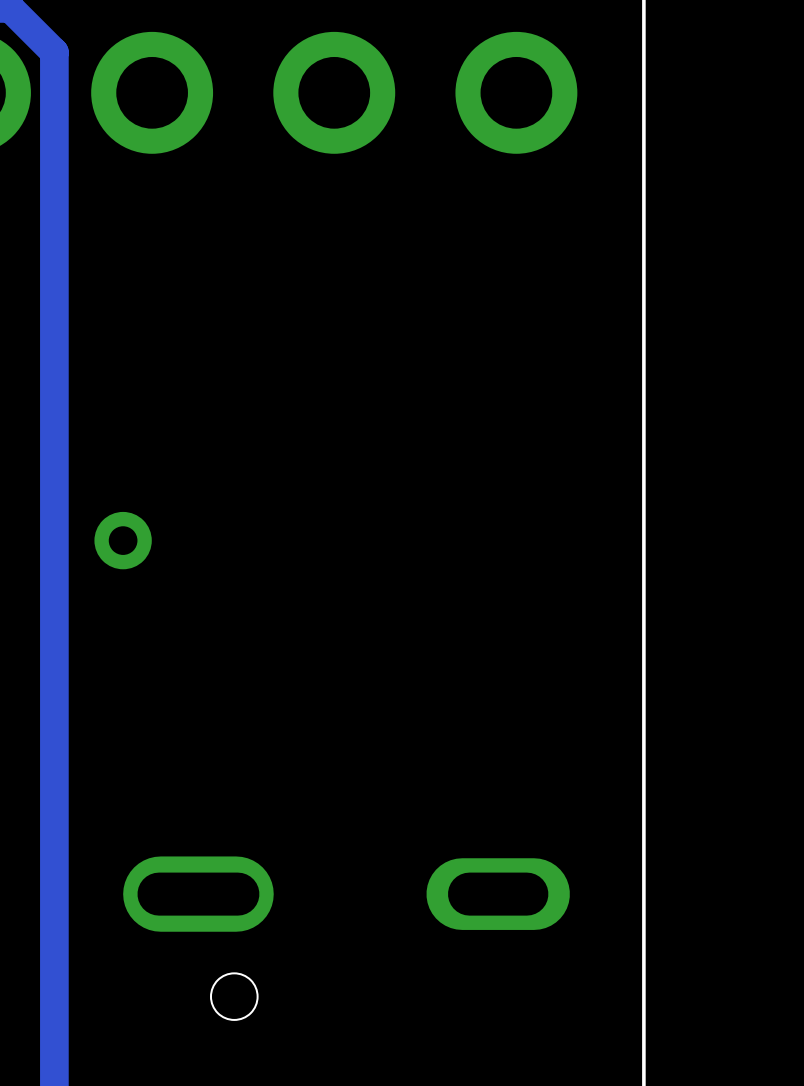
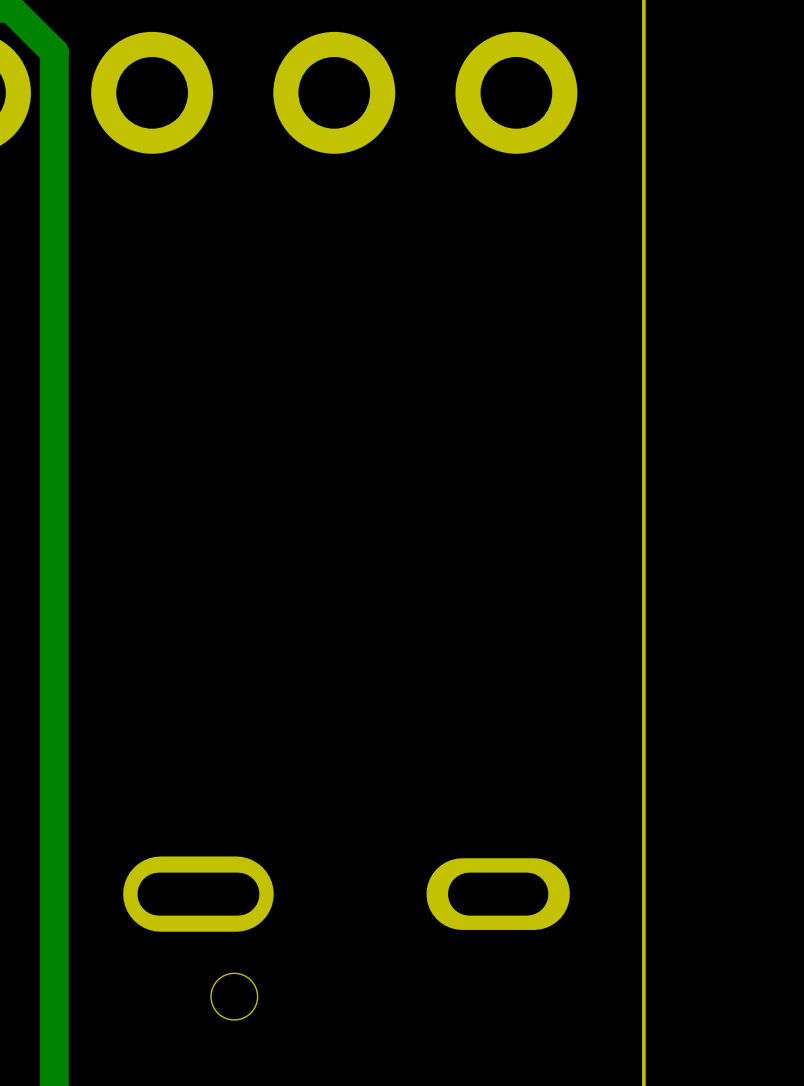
via: (123, 540) -> none

